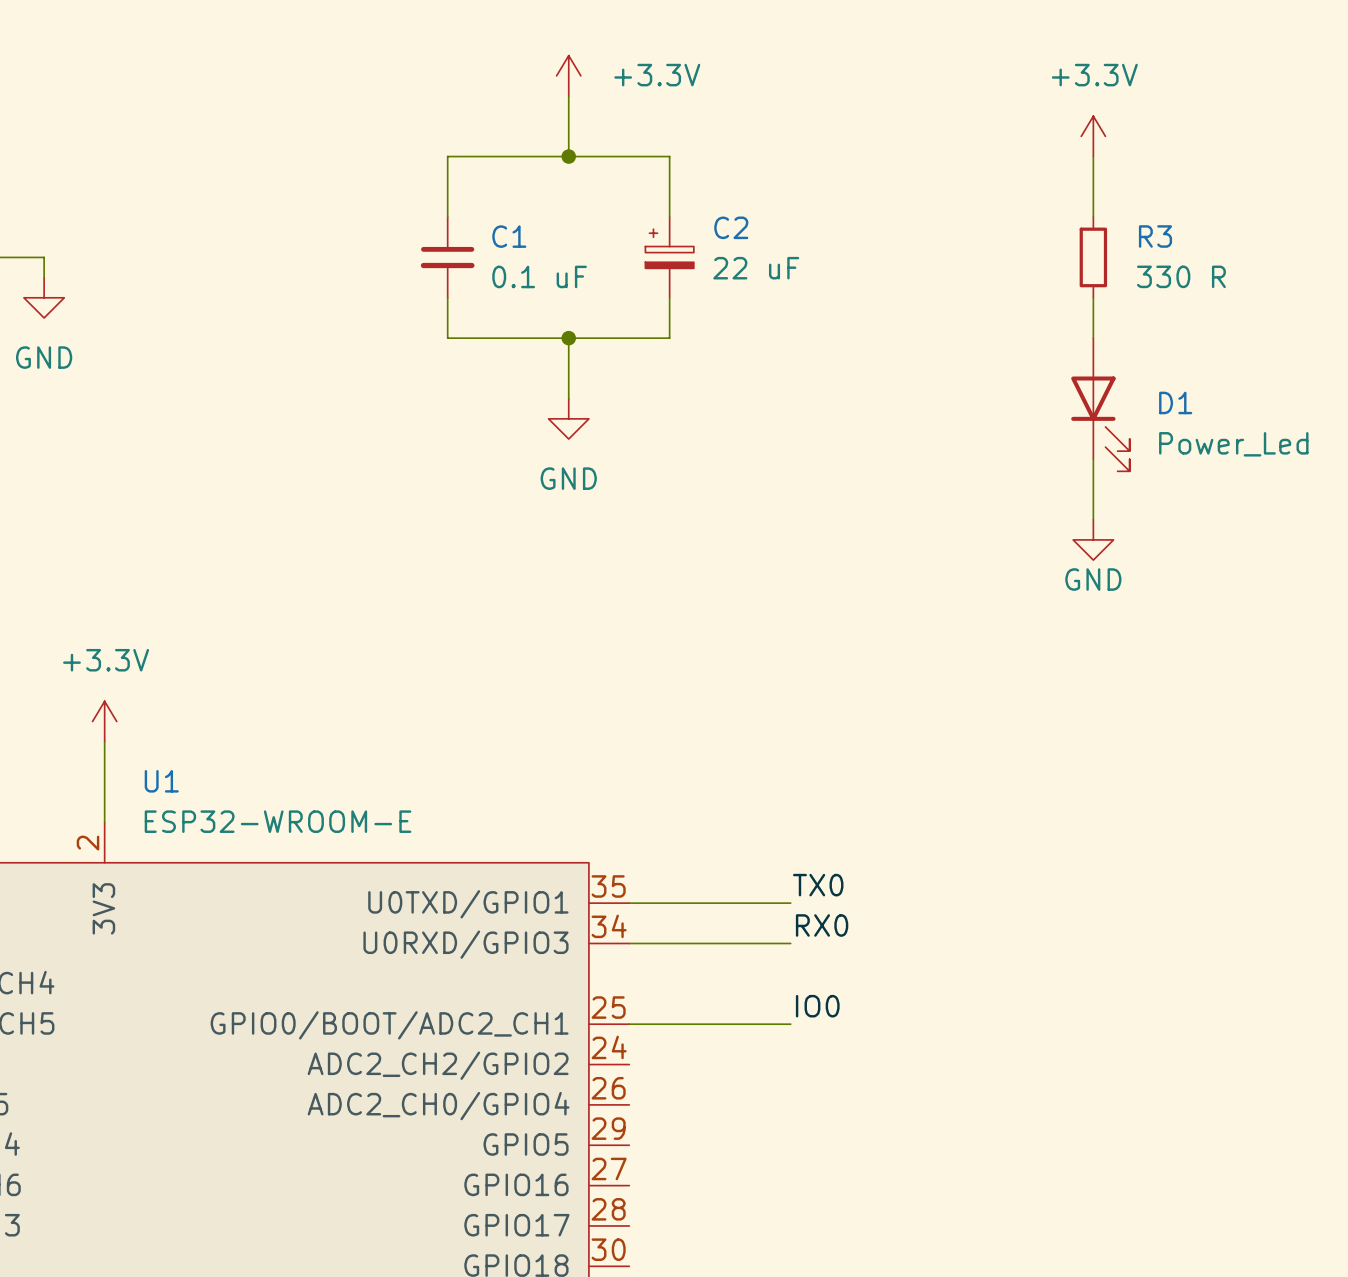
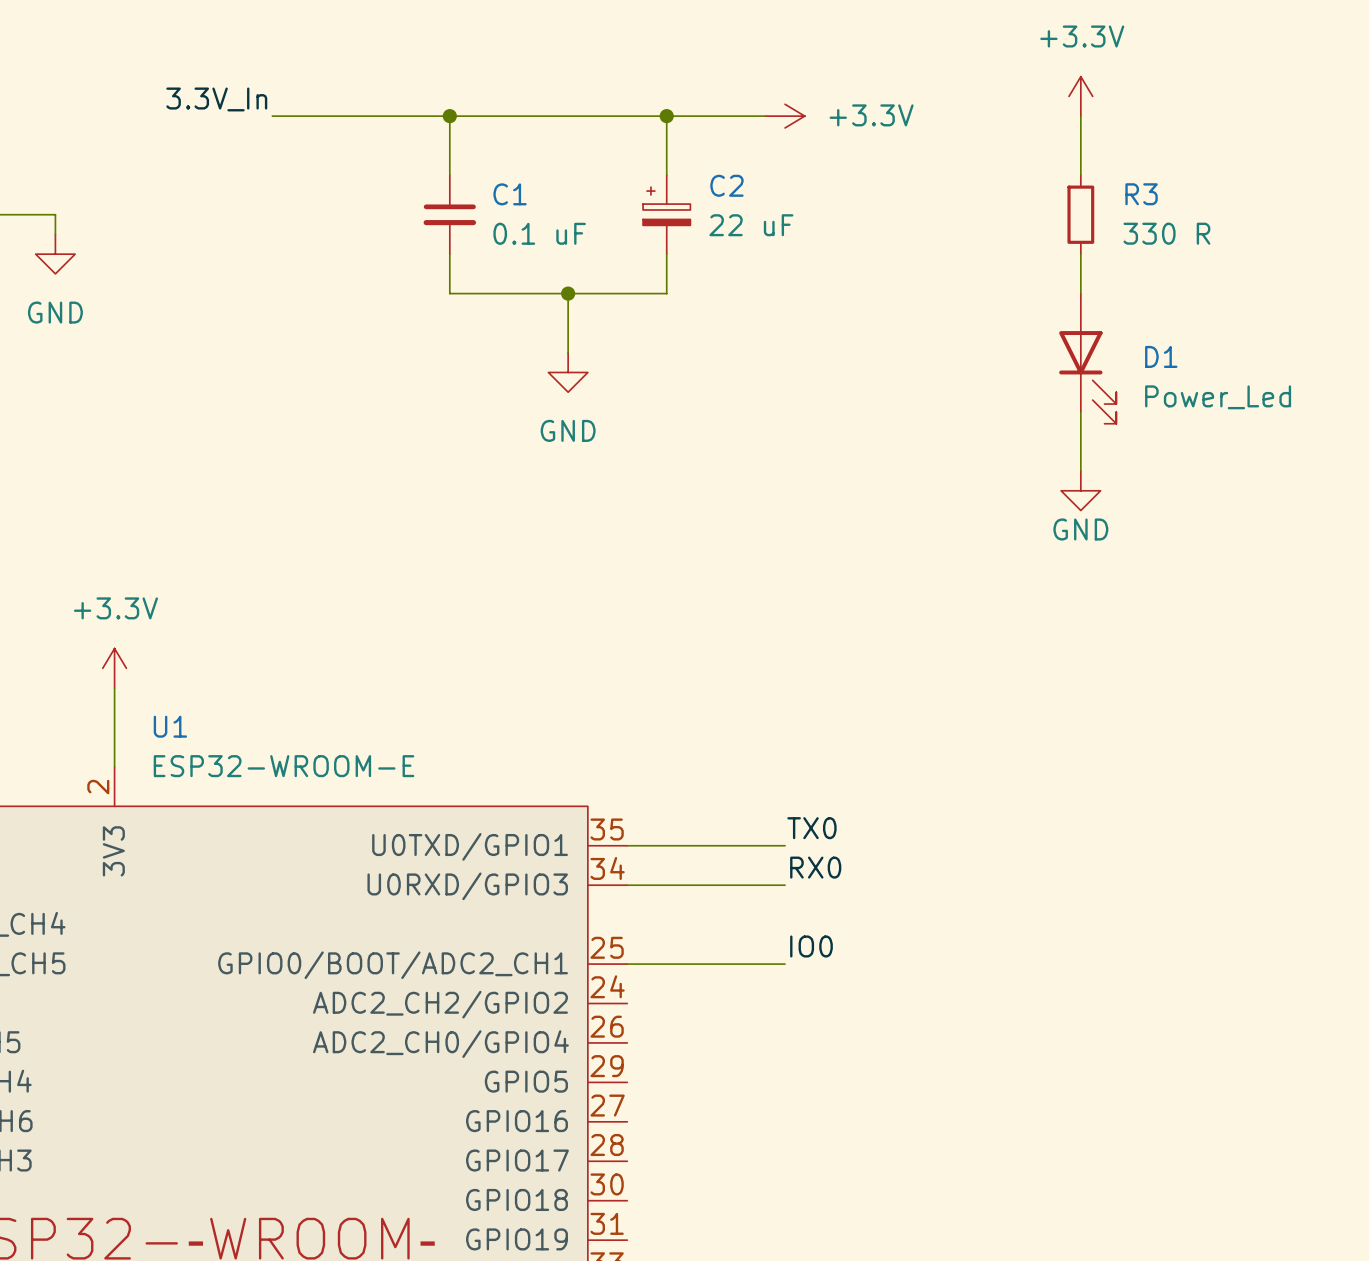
power symbol rotation: 0° (568, 75) -> 90° clockwise (785, 116)
power symbol position: +3.3V (568, 75) -> +3.3V (785, 116)
wire: (568, 96) (568, 156) -> none
label: none -> 3.3V_In (216, 99)
wire: none -> (272, 116) (449, 116)
junction: none -> (449, 116)
junction: (568, 156) -> none
wire: none -> (666, 116) (765, 116)
junction: none -> (666, 116)

